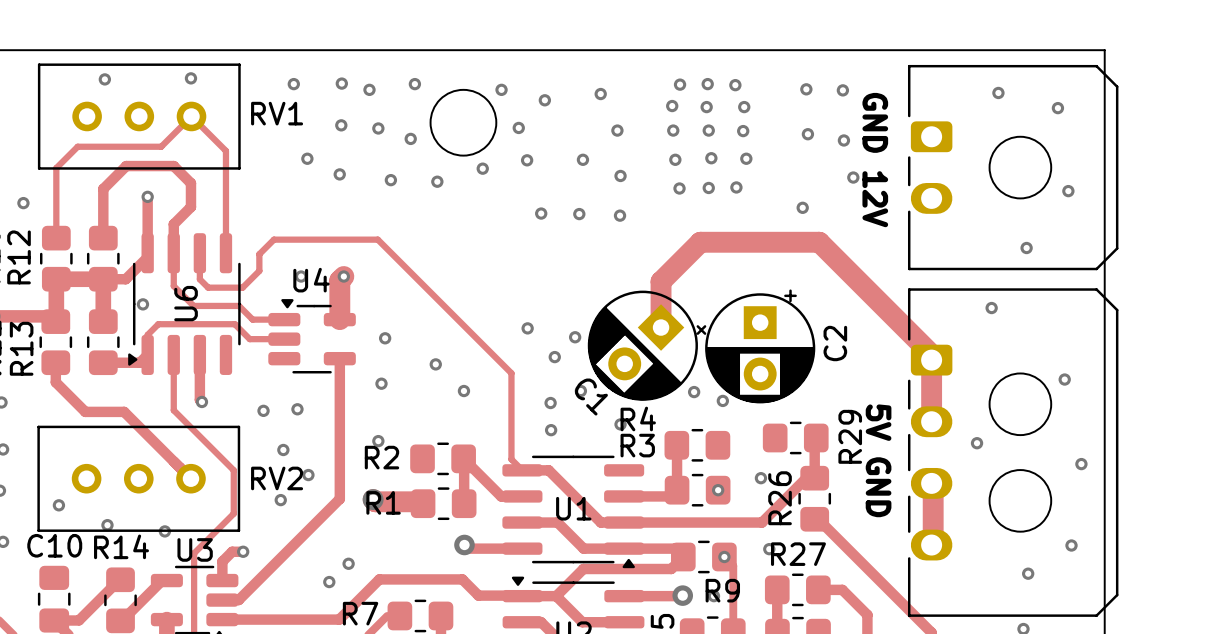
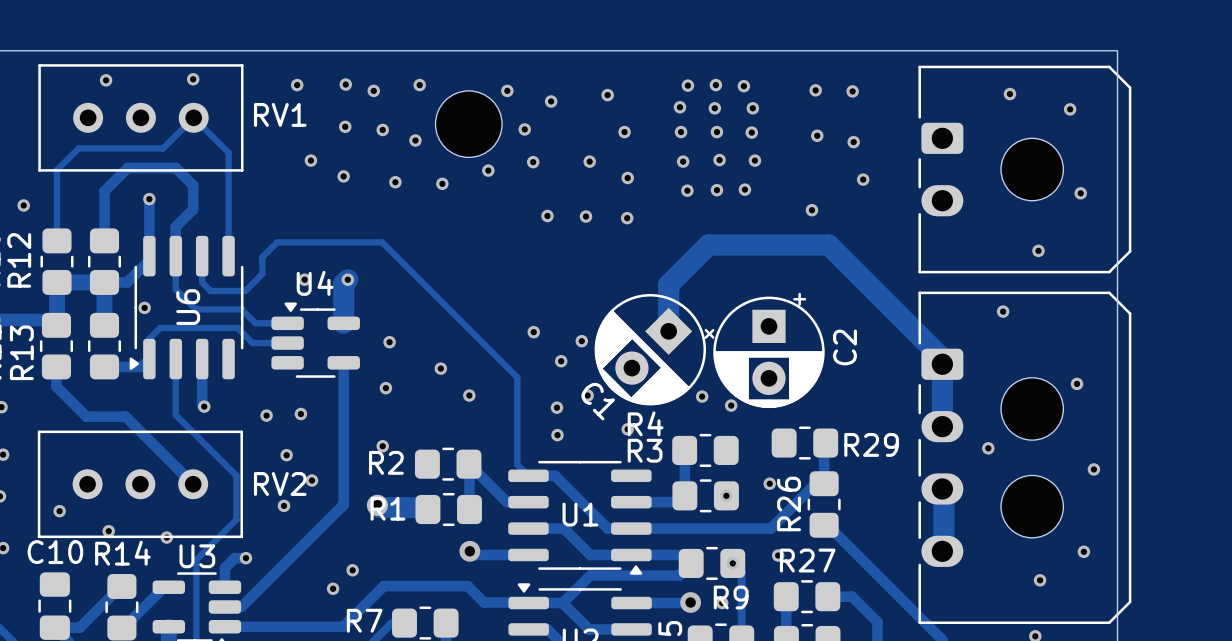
text: GND 12V (875, 160) -> none
R29 name rotation: 0° (850, 436) -> 90° clockwise (871, 444)
text: 5V GND (878, 460) -> none

